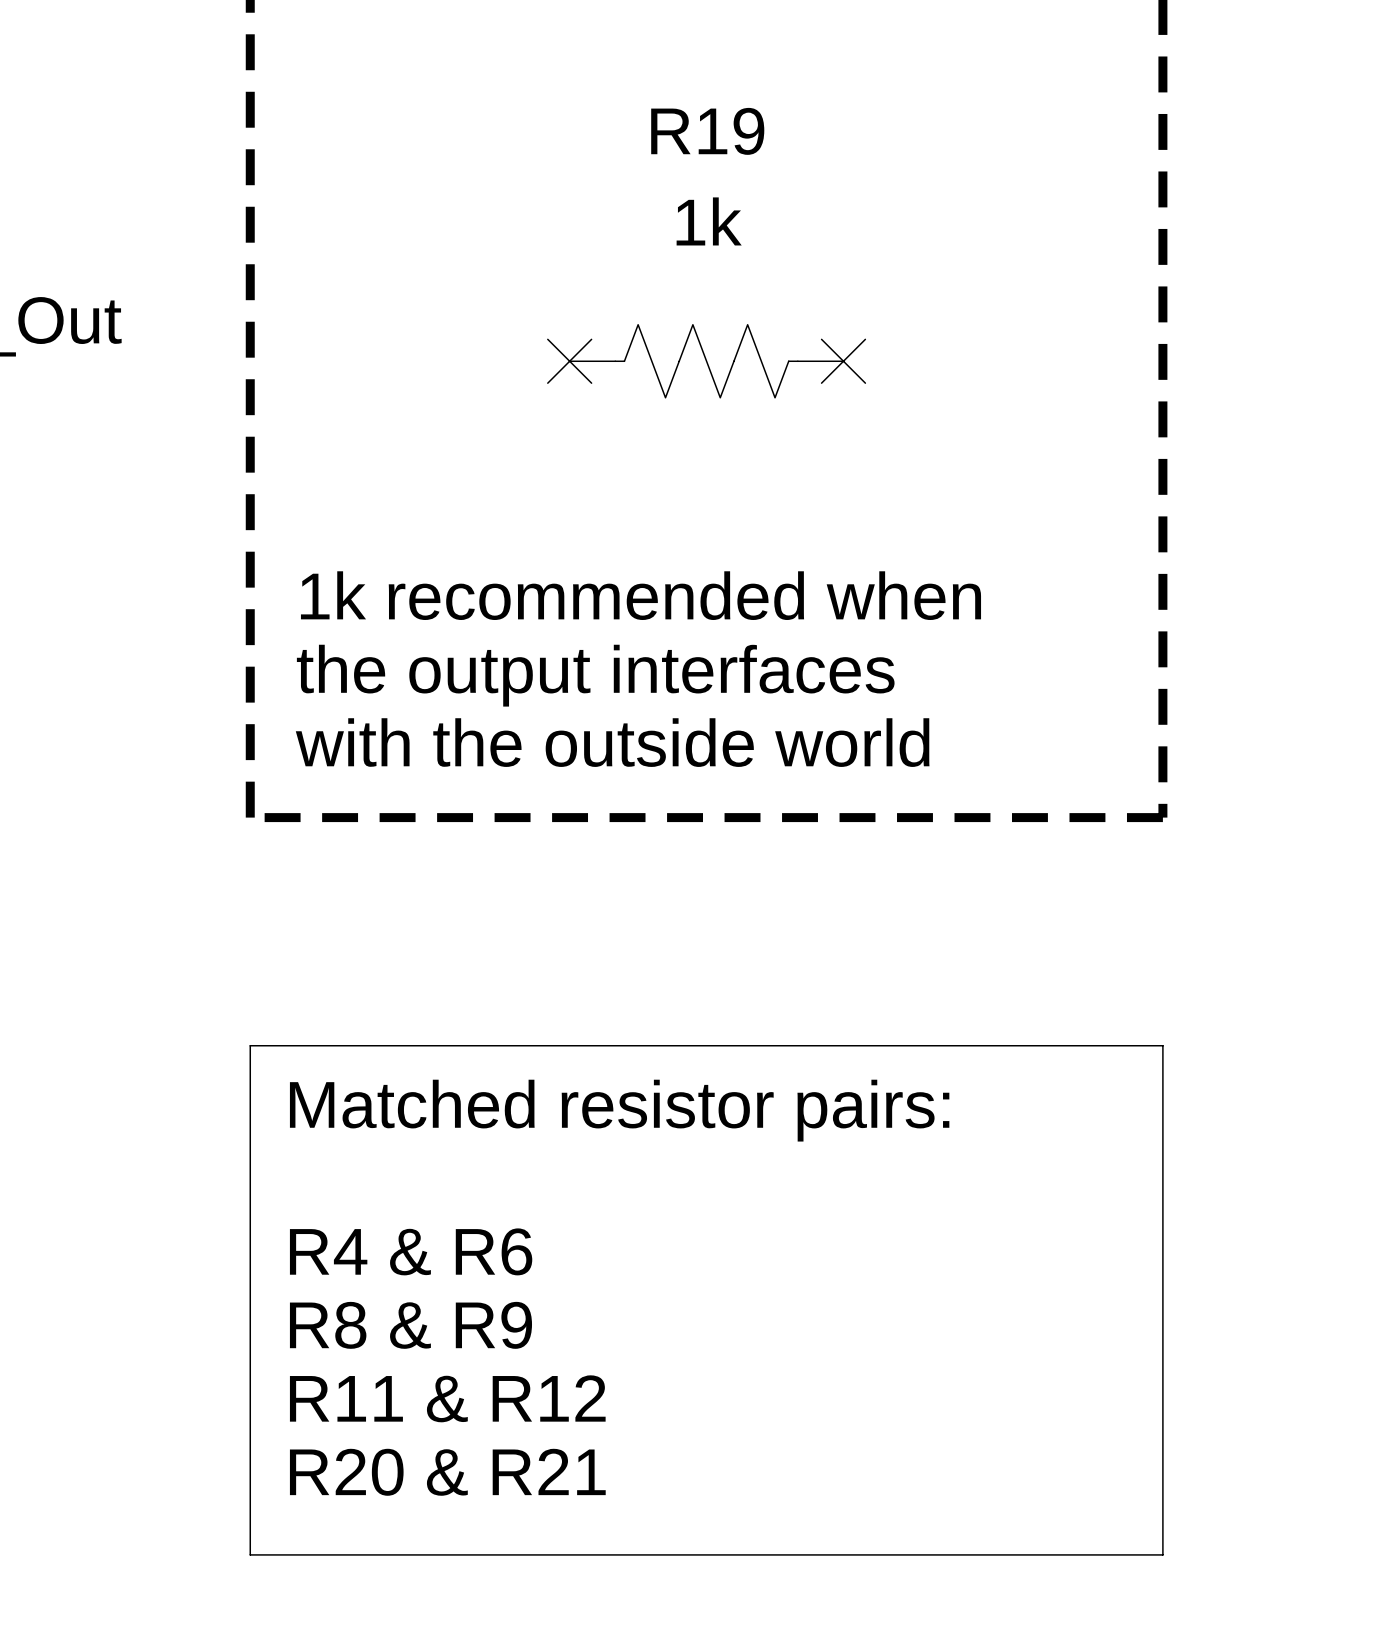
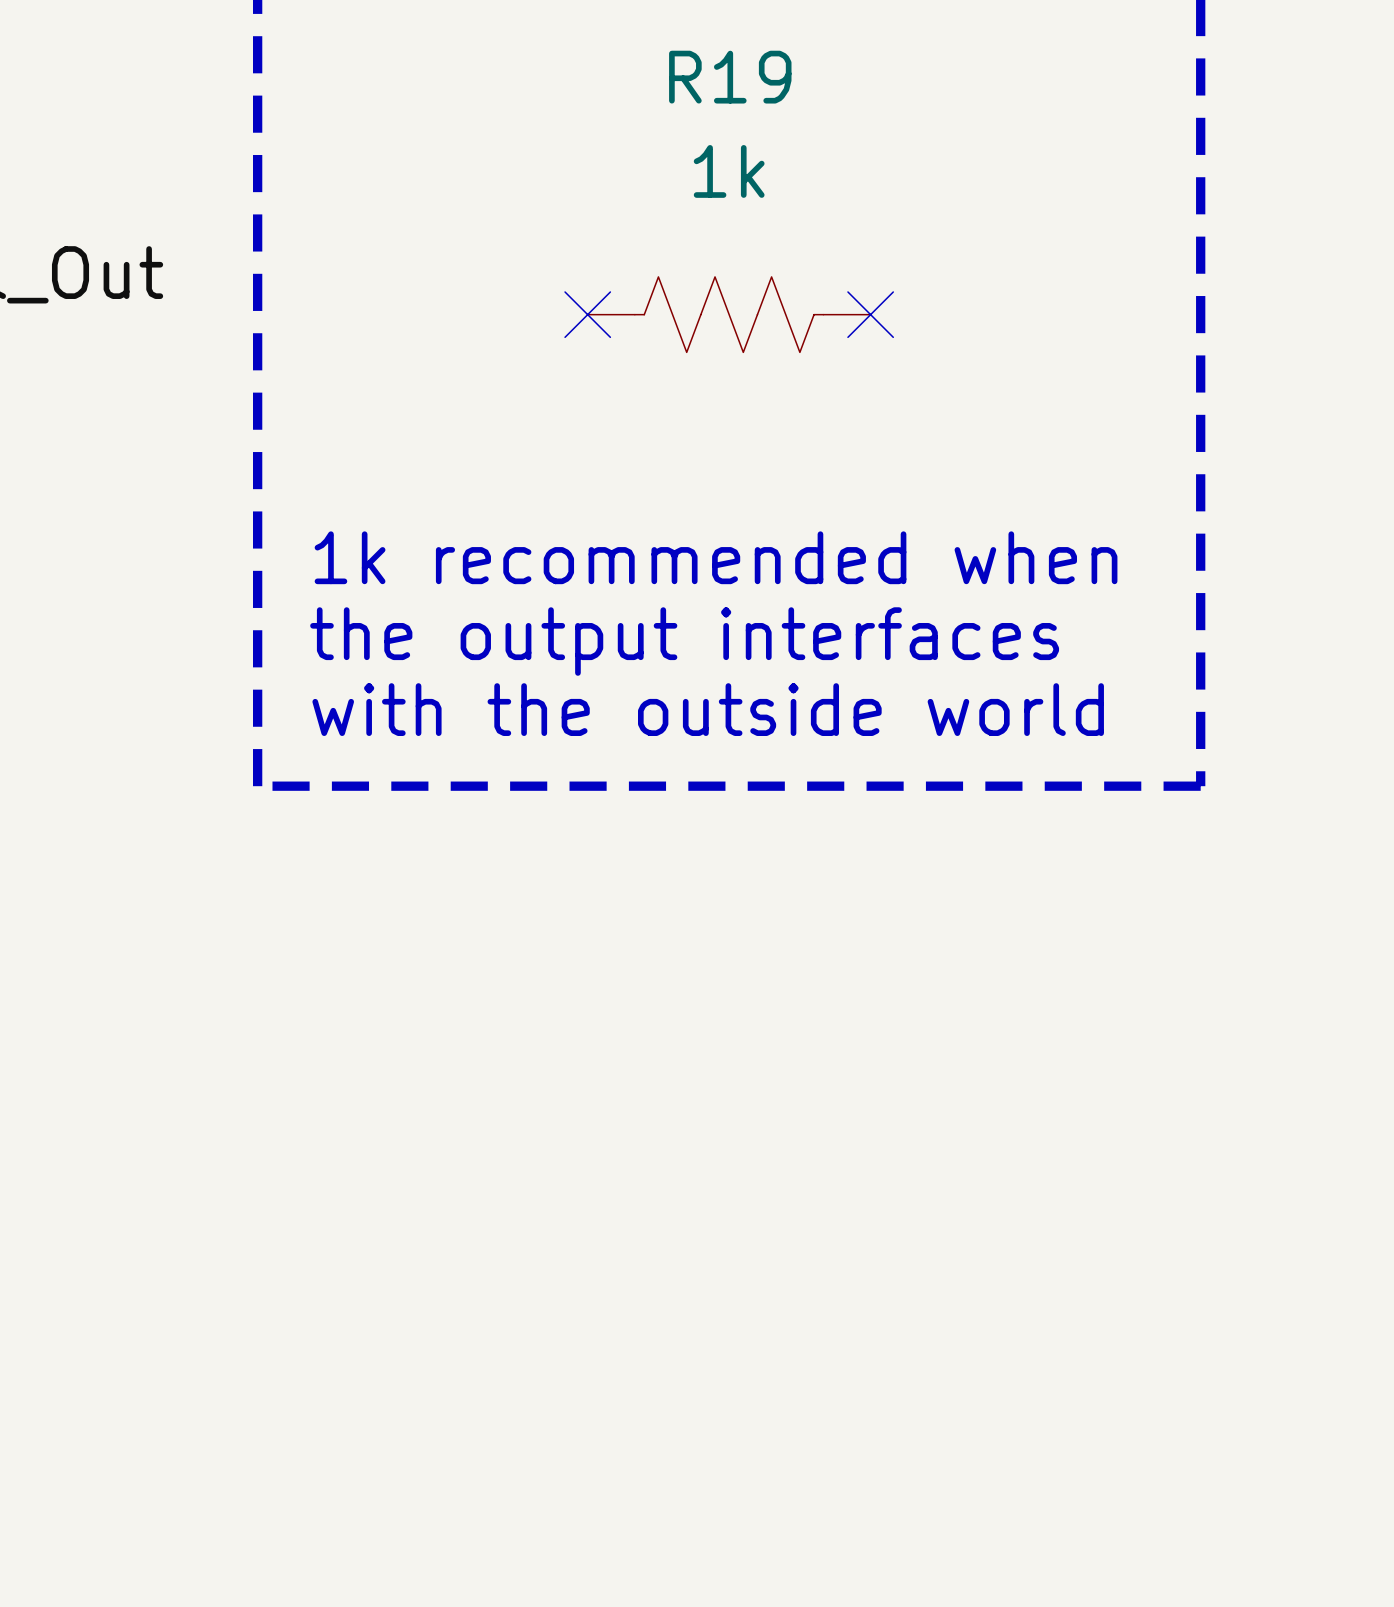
line: (250, 1045) (1162, 1045) (1162, 1554) (250, 1554) (250, 1045) -> none
text: Matched resistor pairs: (619, 1110) -> none
text: R4 & R6 (411, 1251) -> none
text: R8 & R9 (410, 1325) -> none
text: R11 & R12 (447, 1398) -> none
text: R20 & R21 (447, 1472) -> none

